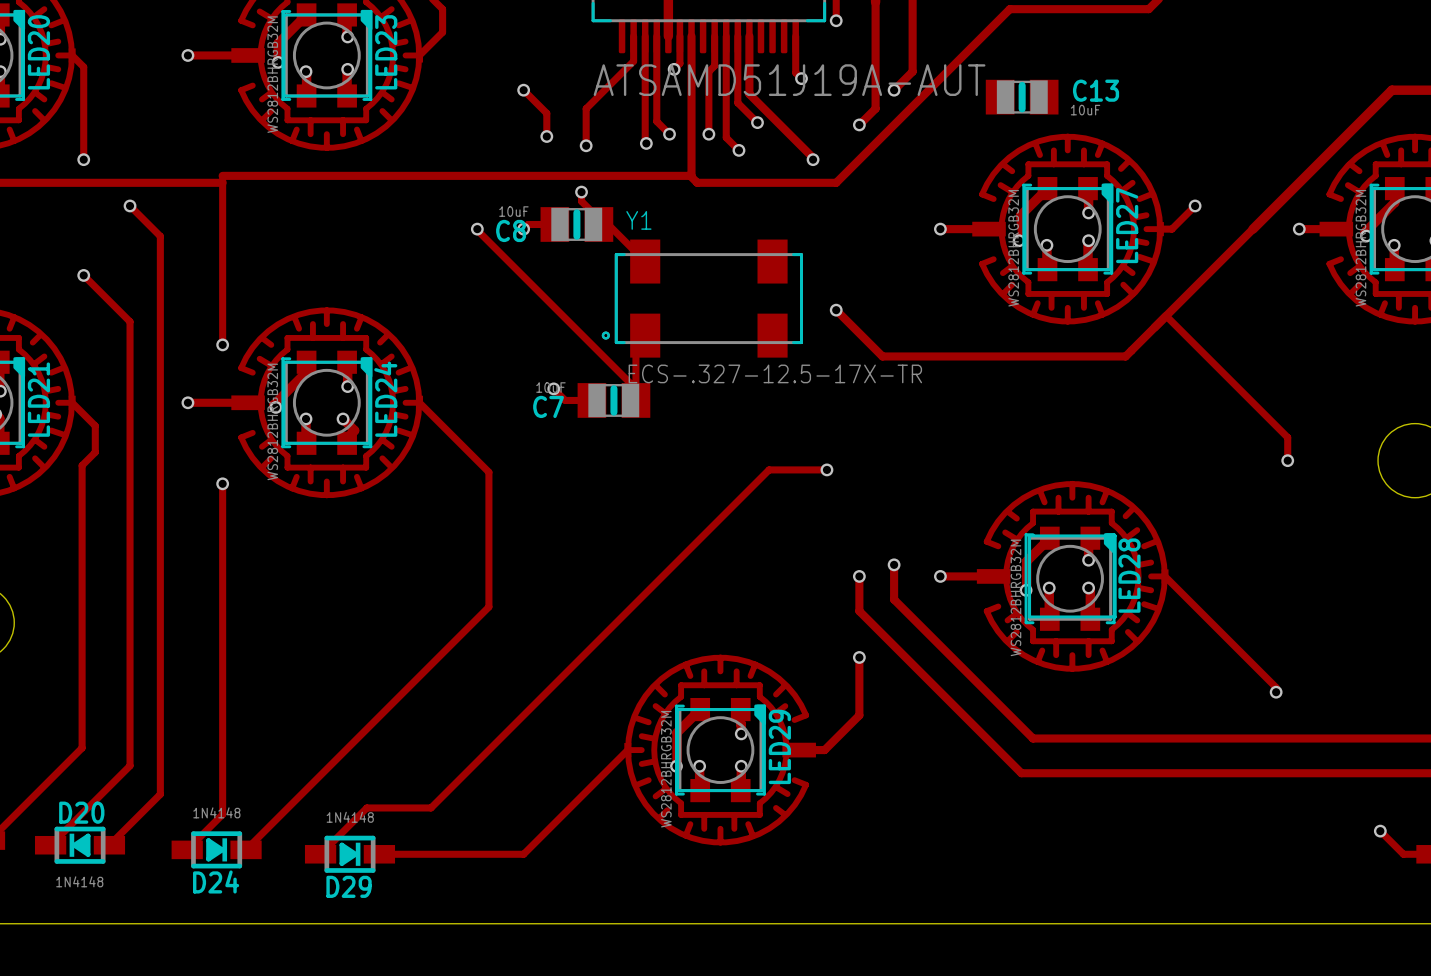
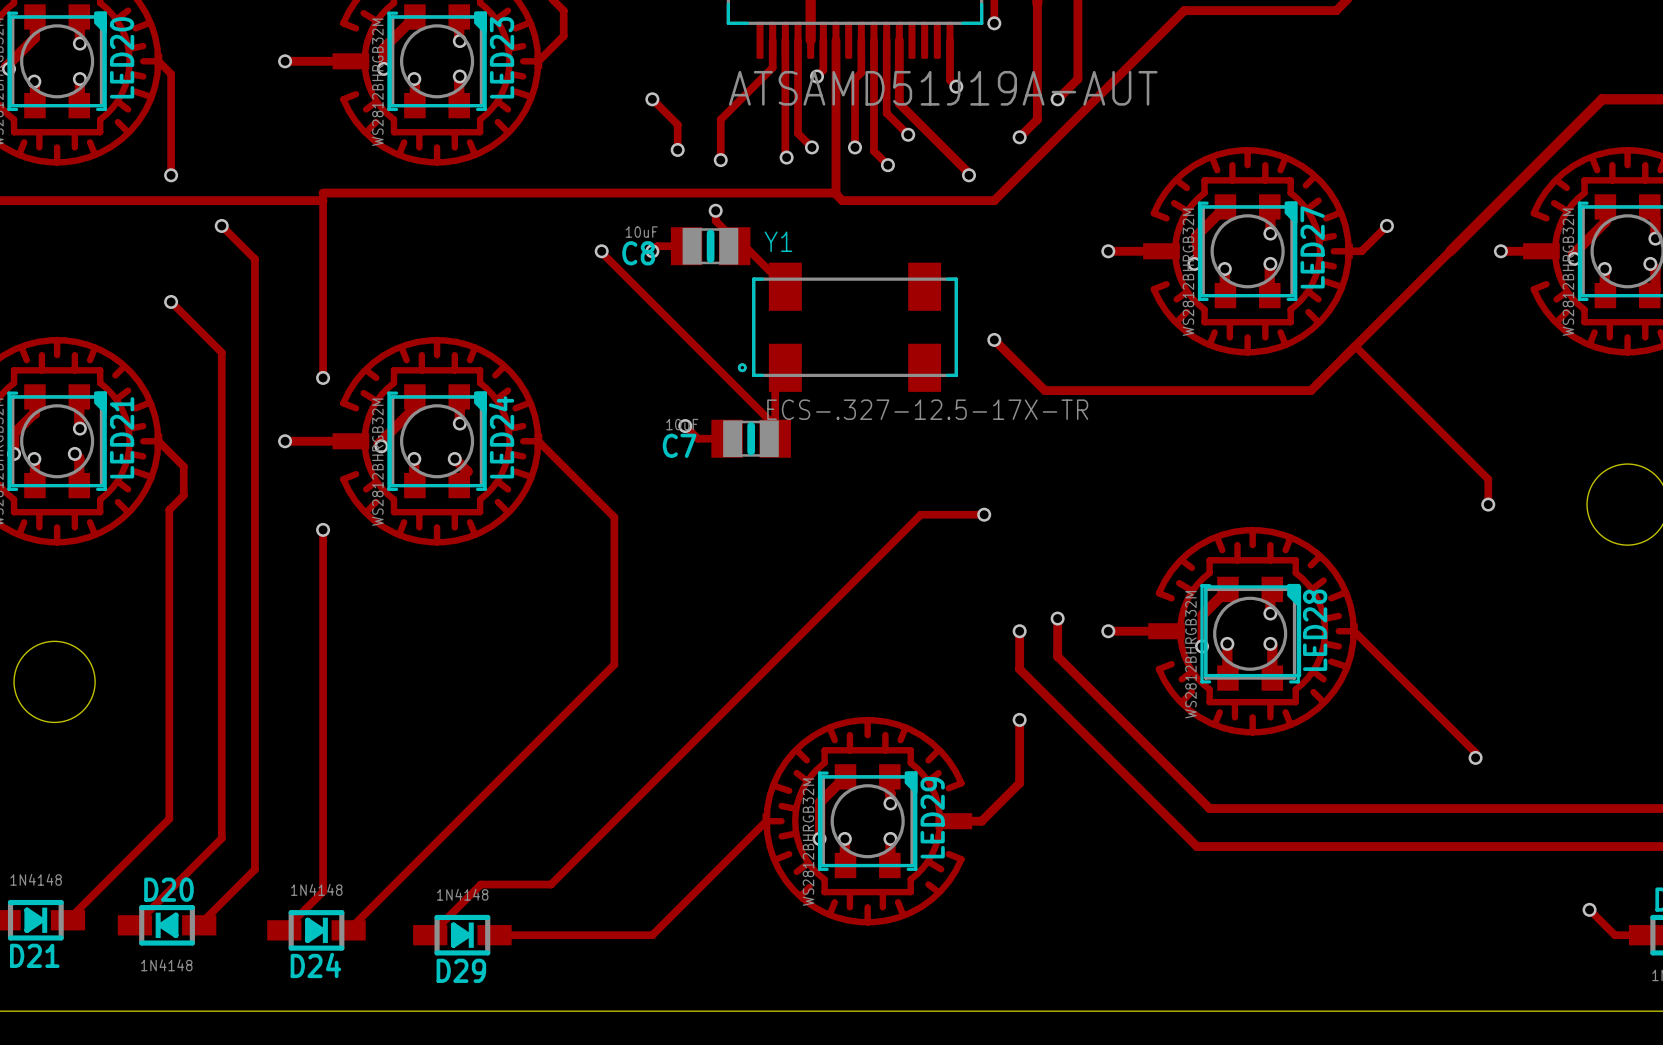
C13: 10uF (1022, 97) -> none

